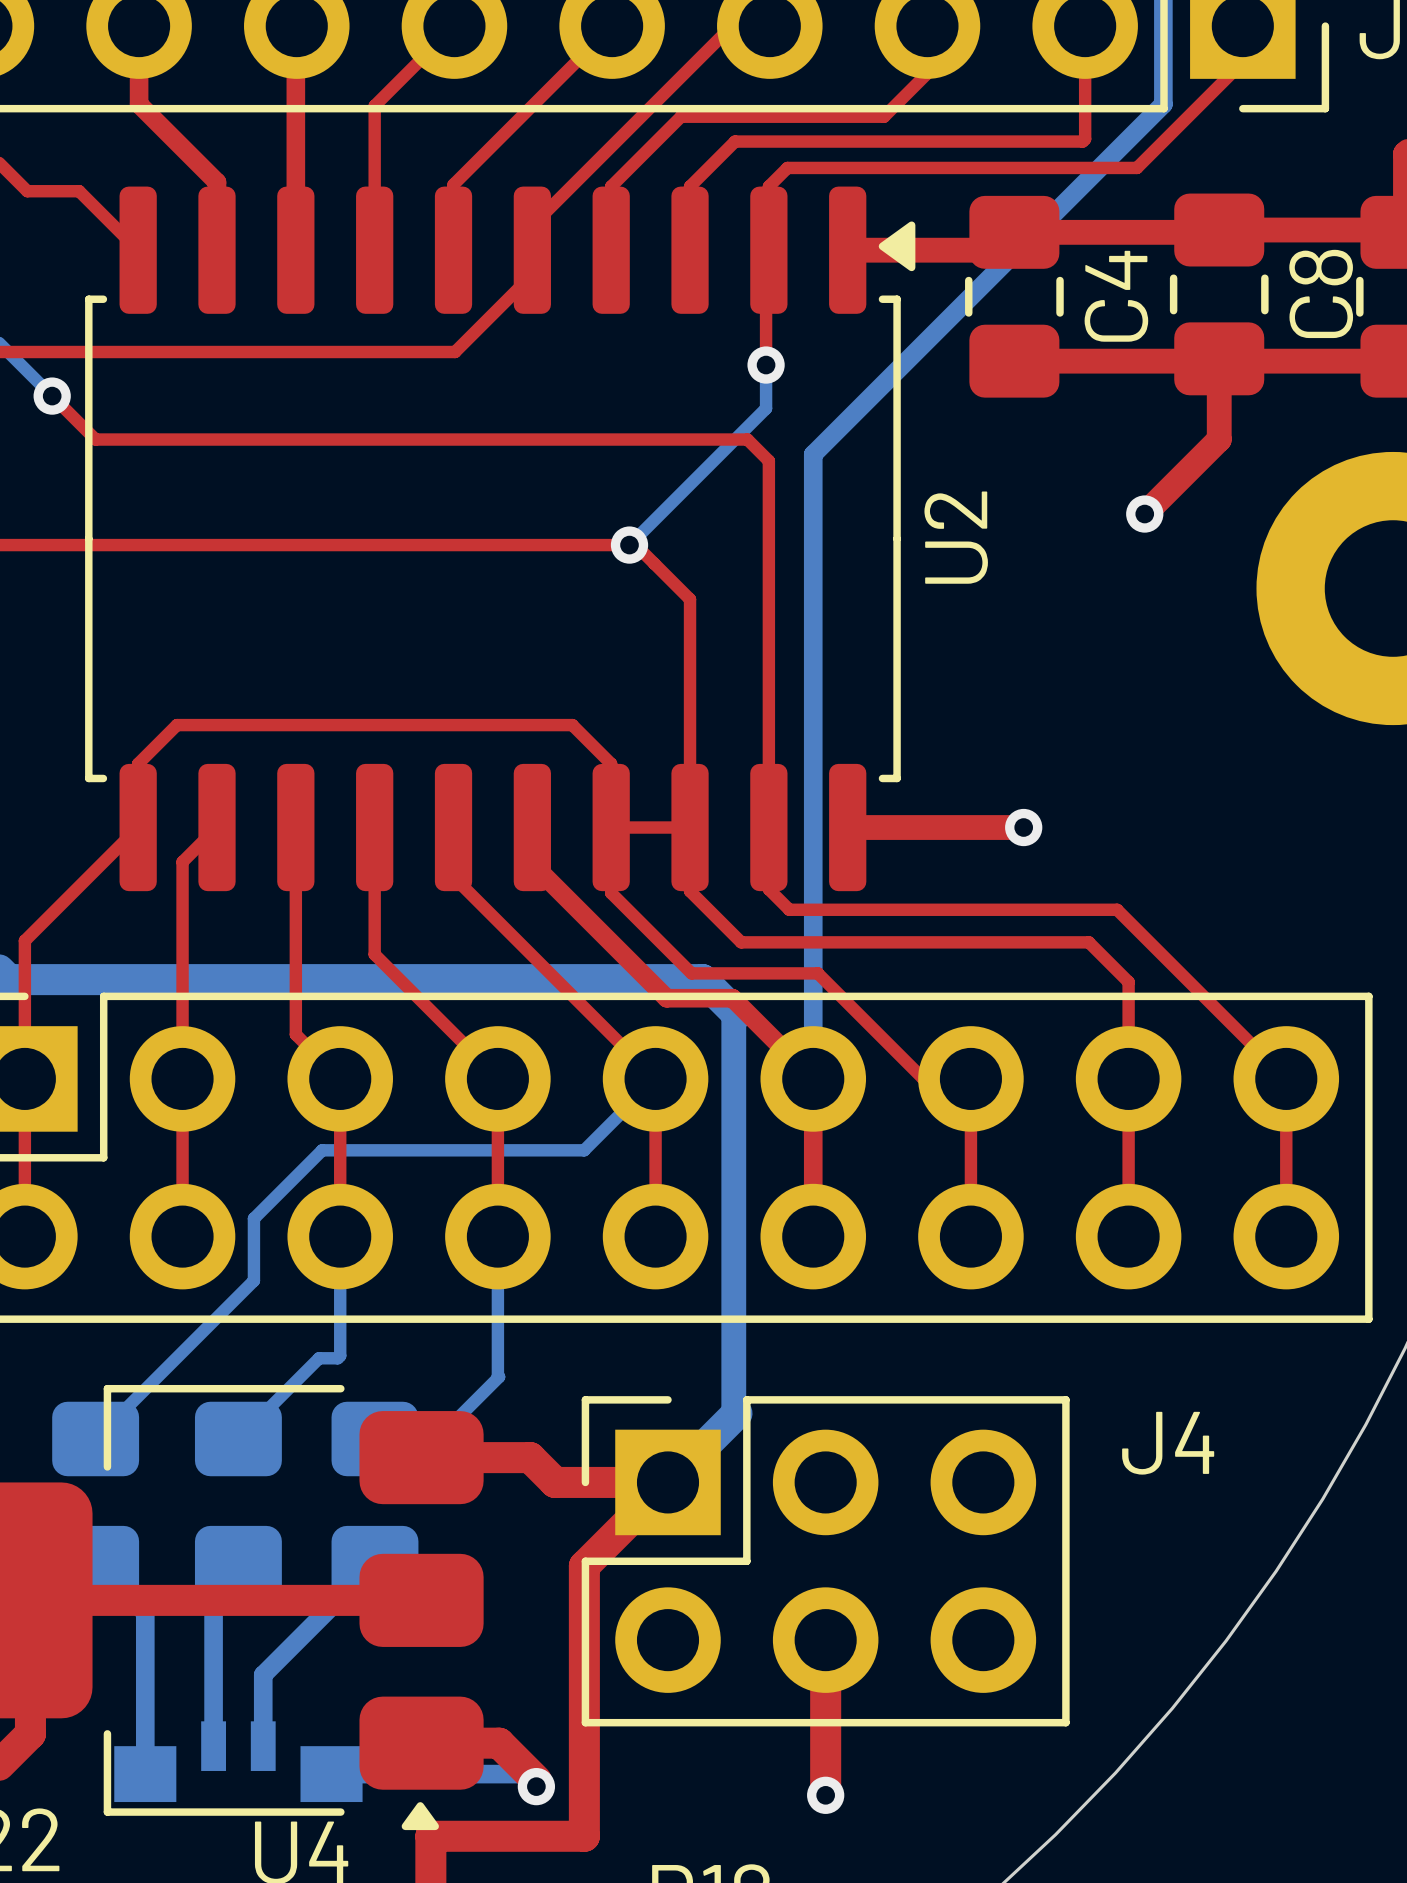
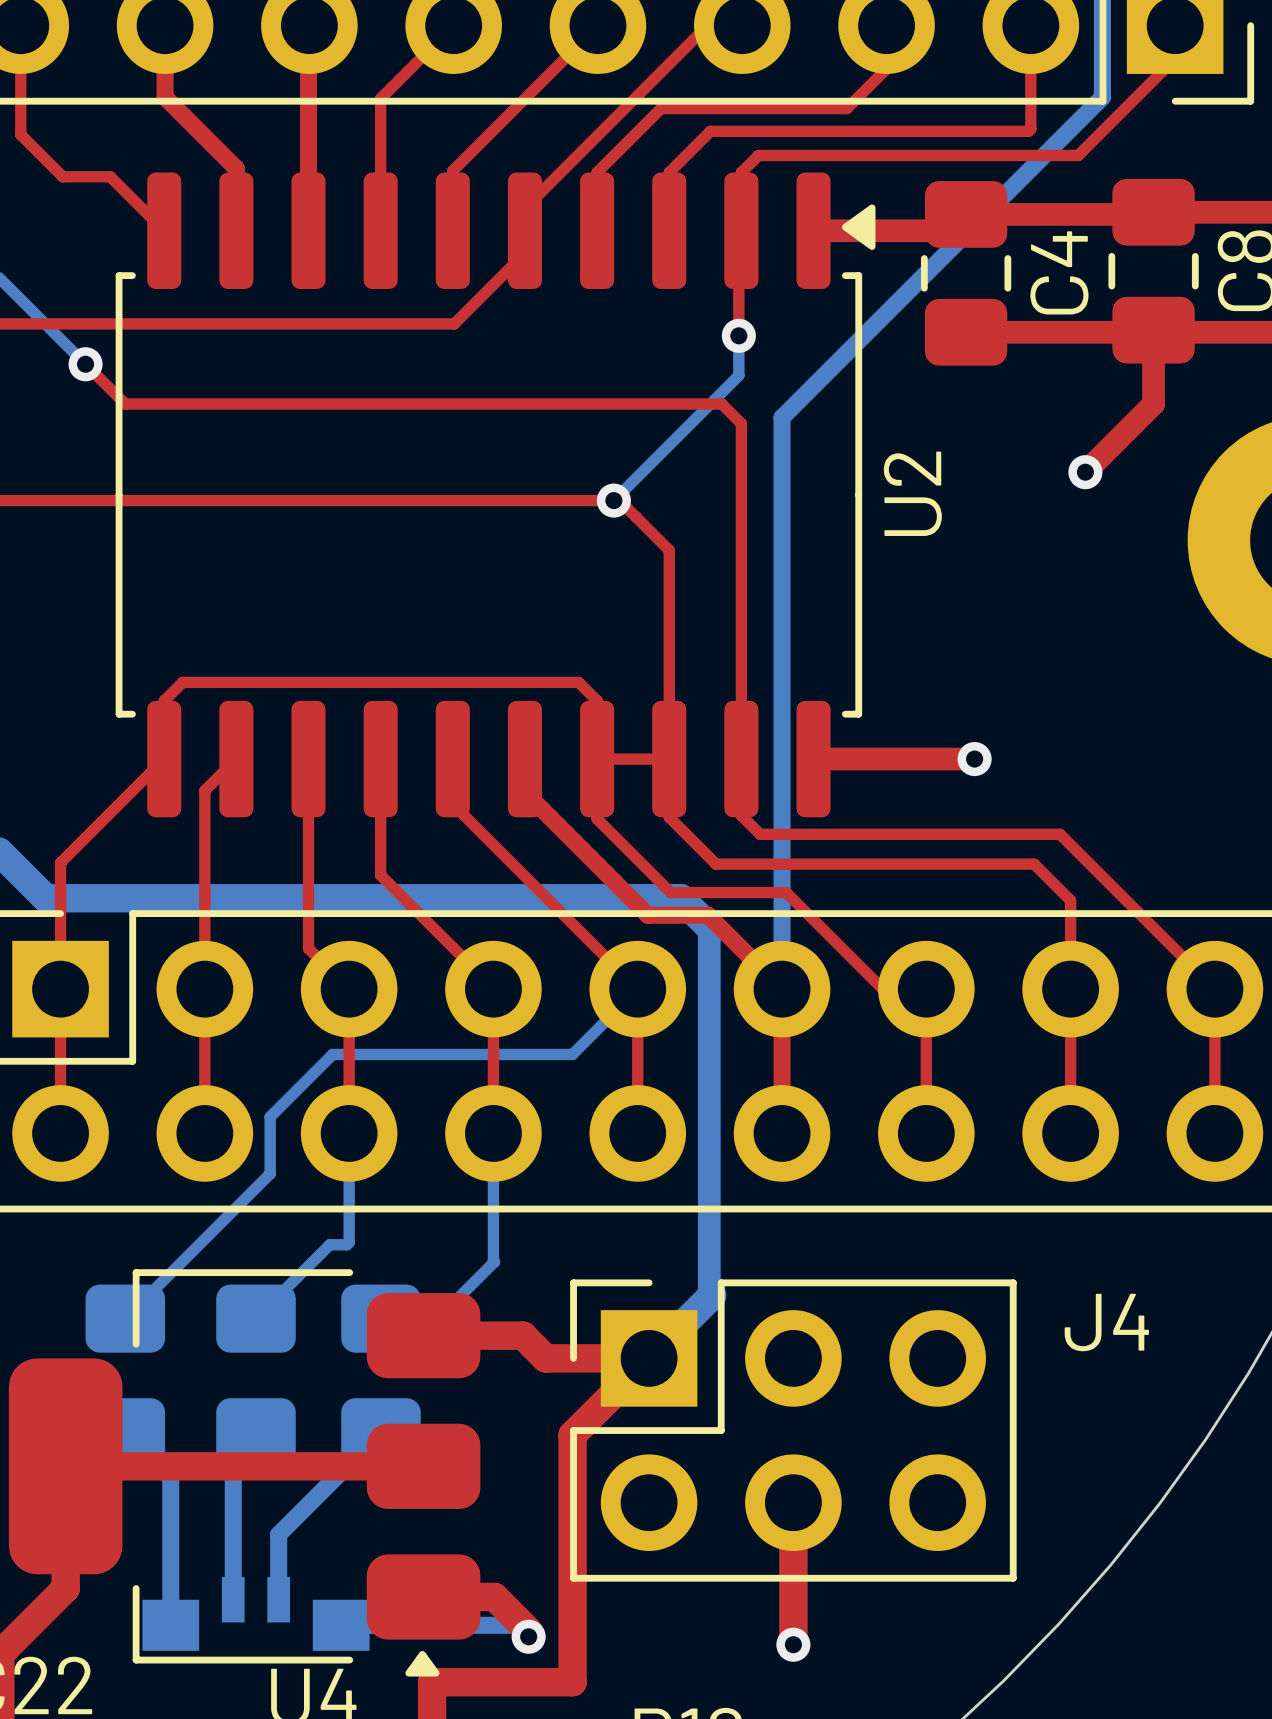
top track: (158, 743) (176, 725) (572, 725) (591, 743) -> (182, 682) (578, 682)

